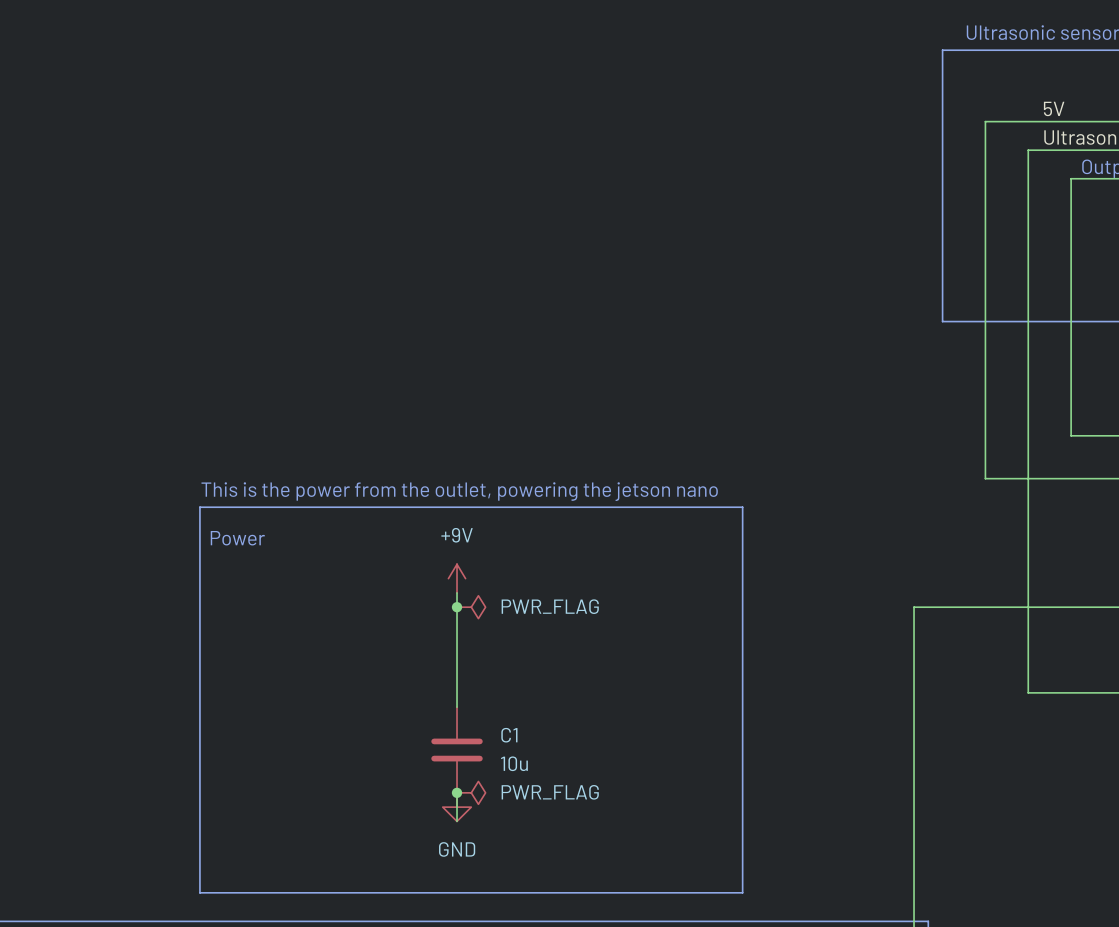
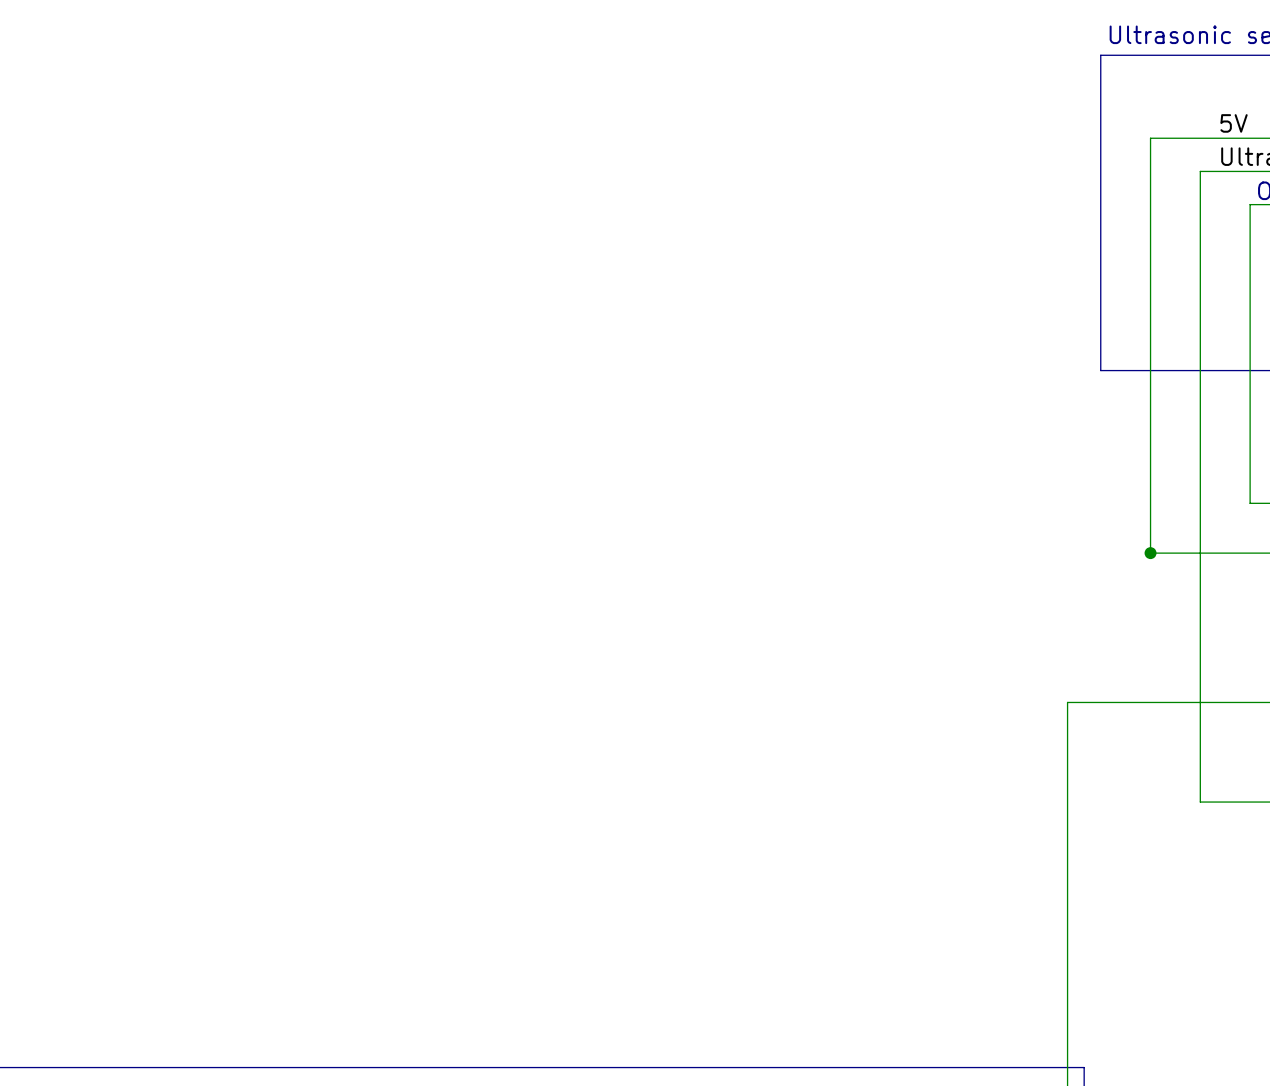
junction: none -> (1150, 553)
text: This is the power from the outlet, powering the jetson nano (459, 491) -> none
line: (199, 507) (742, 507) (742, 892) (199, 892) (199, 507) -> none
text: Power (237, 538) -> none
power symbol: +9V (457, 578) -> none
wire: (457, 592) (457, 707) -> none
junction: (457, 607) -> none
power symbol: PWR_FLAG (471, 607) -> none
C1: 10u (457, 750) -> none
wire: (457, 792) (457, 821) -> none
junction: (457, 792) -> none
power symbol: PWR_FLAG (471, 792) -> none
power symbol: GND (457, 807) -> none

